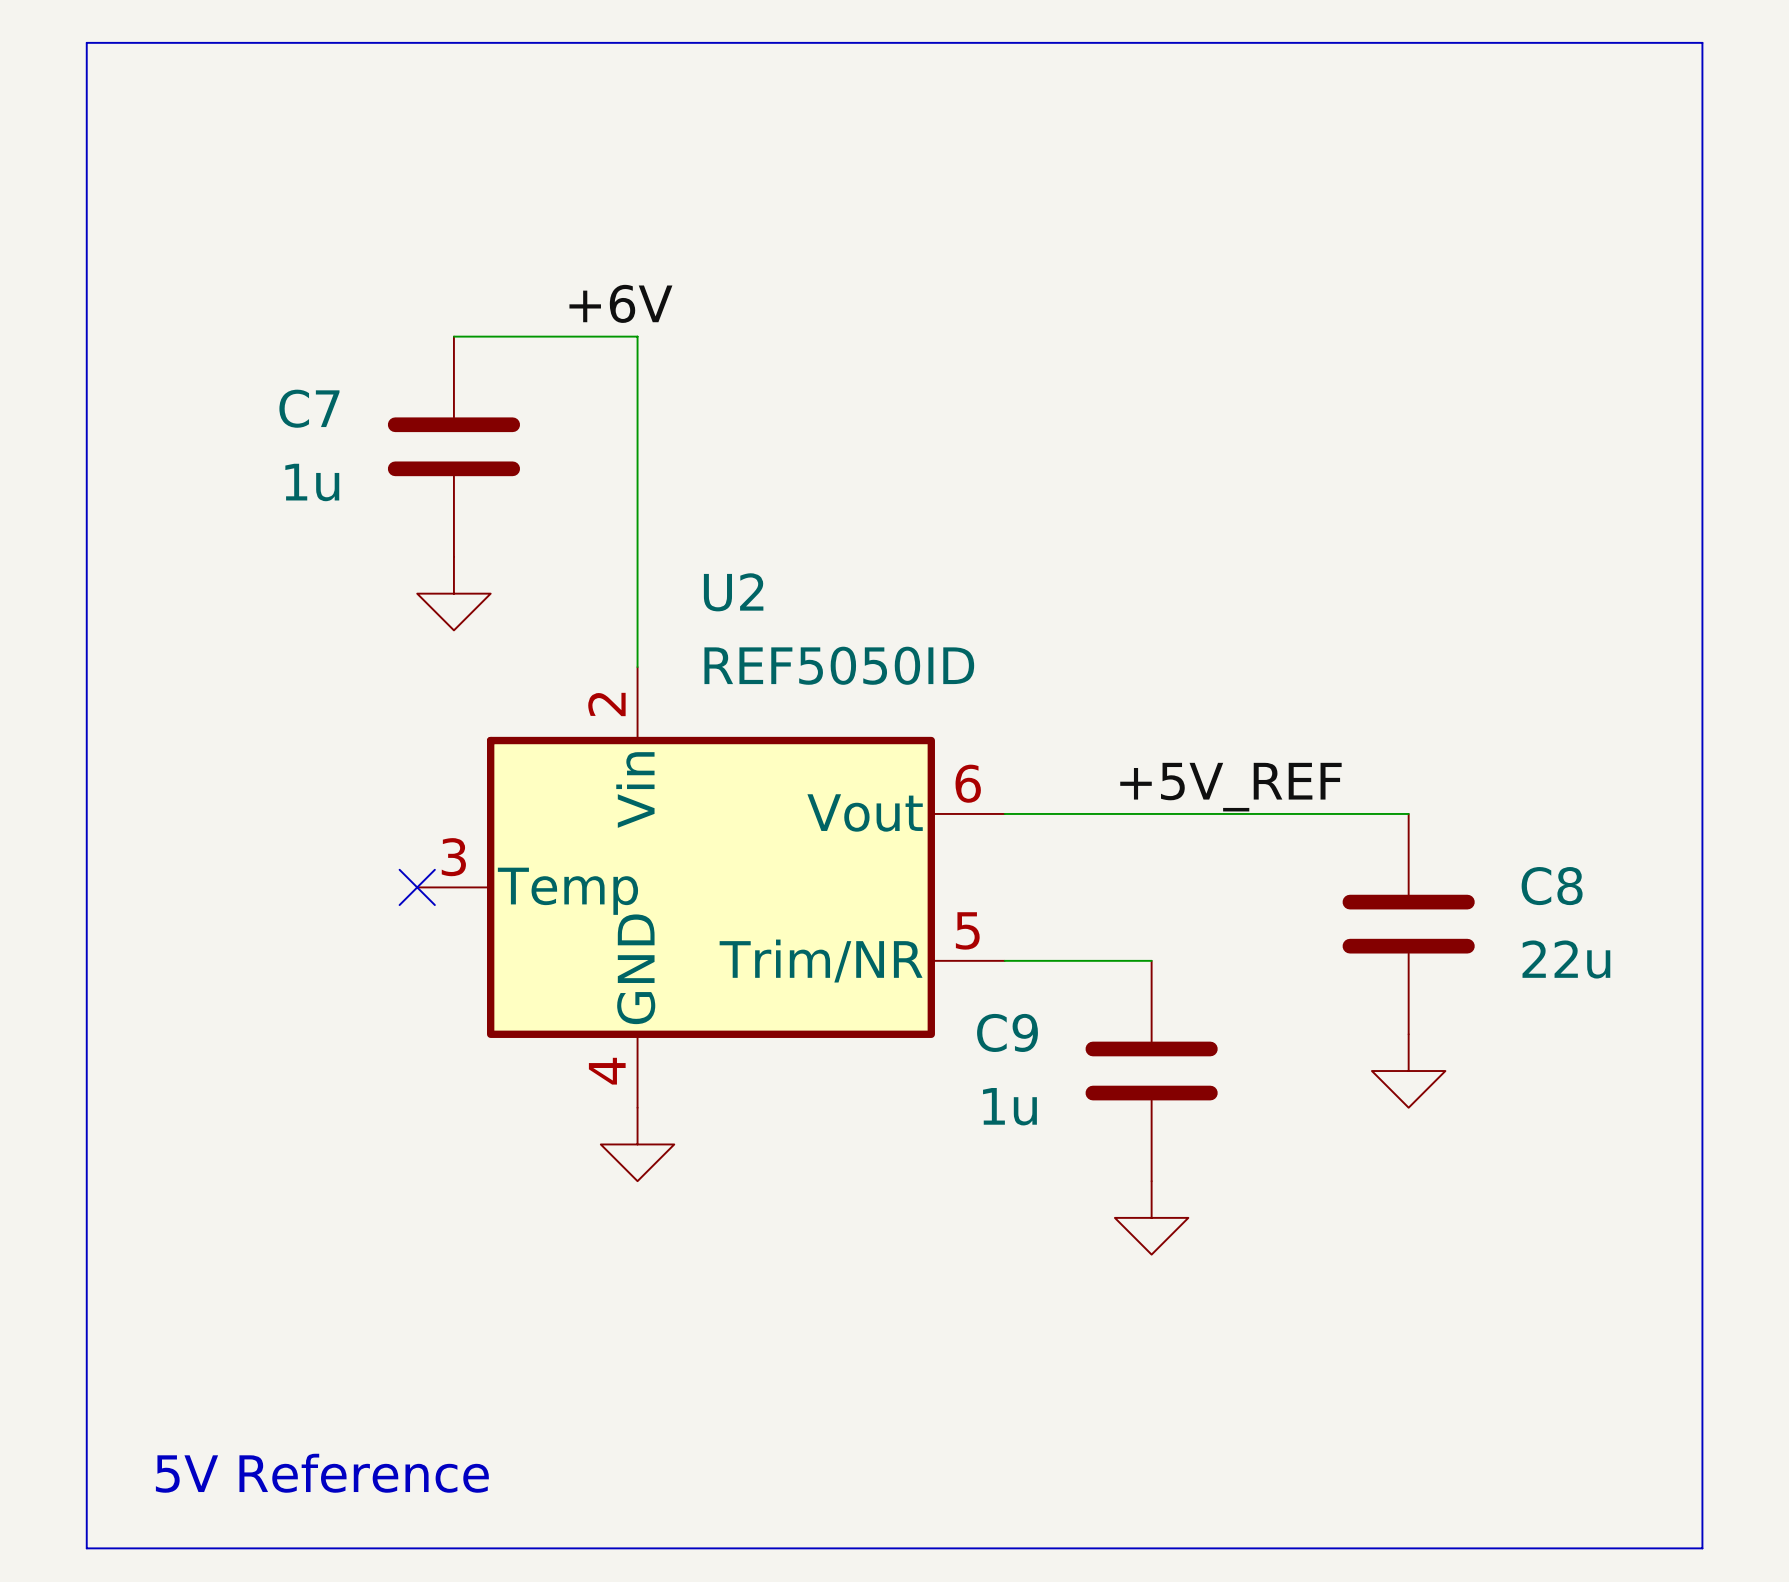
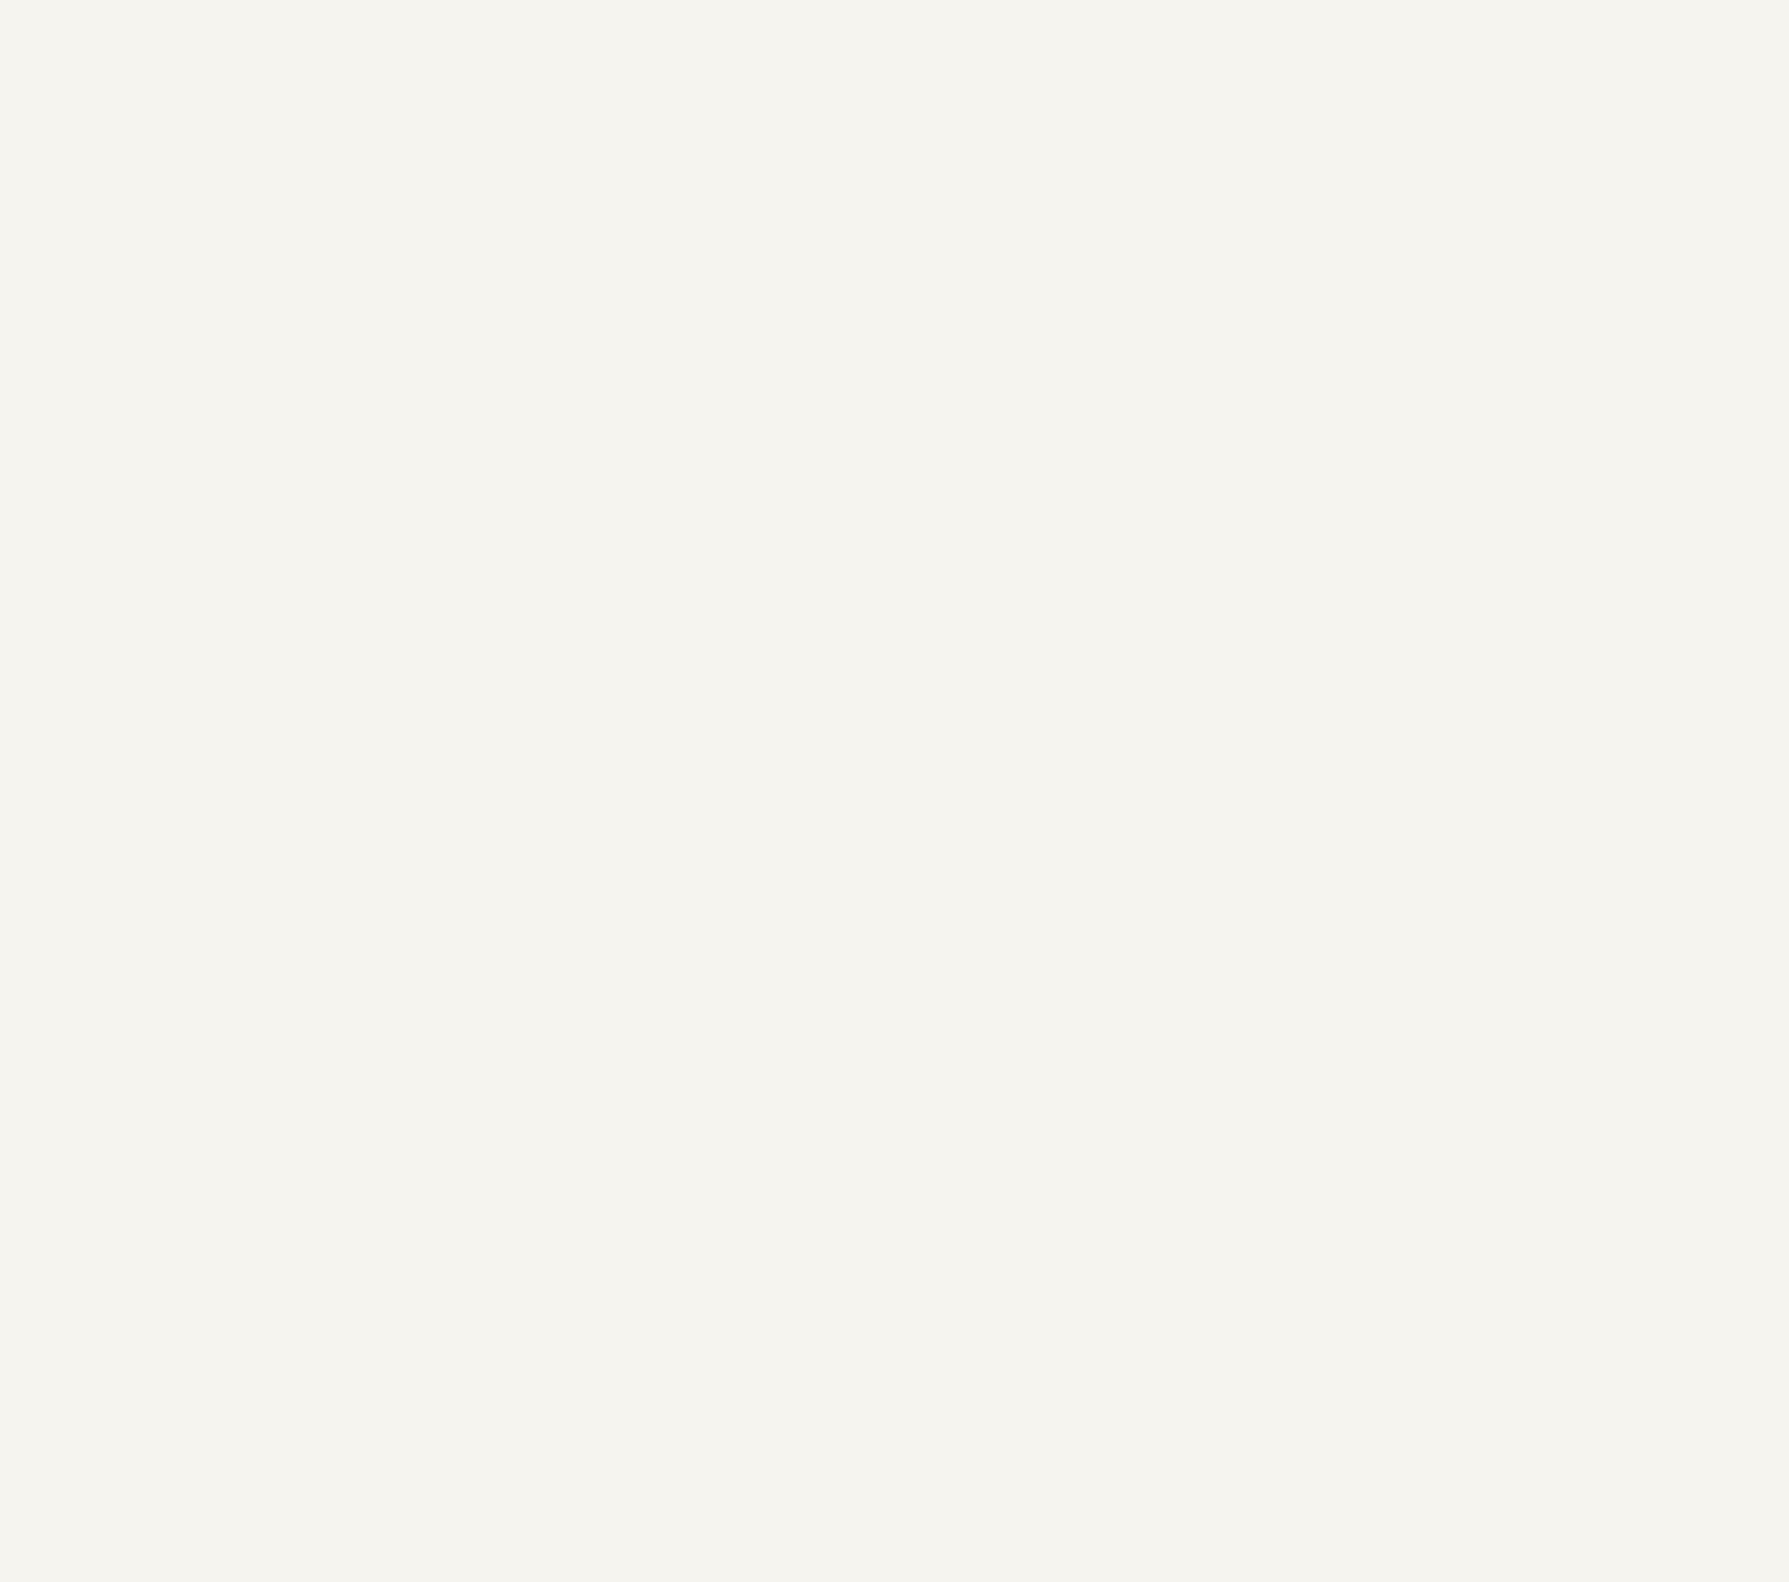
line: (86, 42) (1702, 42) (1702, 1548) (86, 1548) (86, 42) -> none
label: +6V (620, 303) -> none
wire: (453, 336) (637, 336) (637, 667) -> none
C7: 1u (453, 446) -> none
power symbol: (453, 593) -> none
label: +5V_REF (1230, 787) -> none
wire: (1004, 813) (1408, 813) -> none
no-connect mark: (417, 887) -> none
U2: REF5050ID (710, 887) -> none
C8: 22u (1408, 924) -> none
wire: (1004, 960) (1151, 960) -> none
C9: 1u (1151, 1071) -> none
power symbol: (1408, 1071) -> none
power symbol: (637, 1144) -> none
power symbol: (1151, 1217) -> none
text: 5V Reference (322, 1473) -> none

